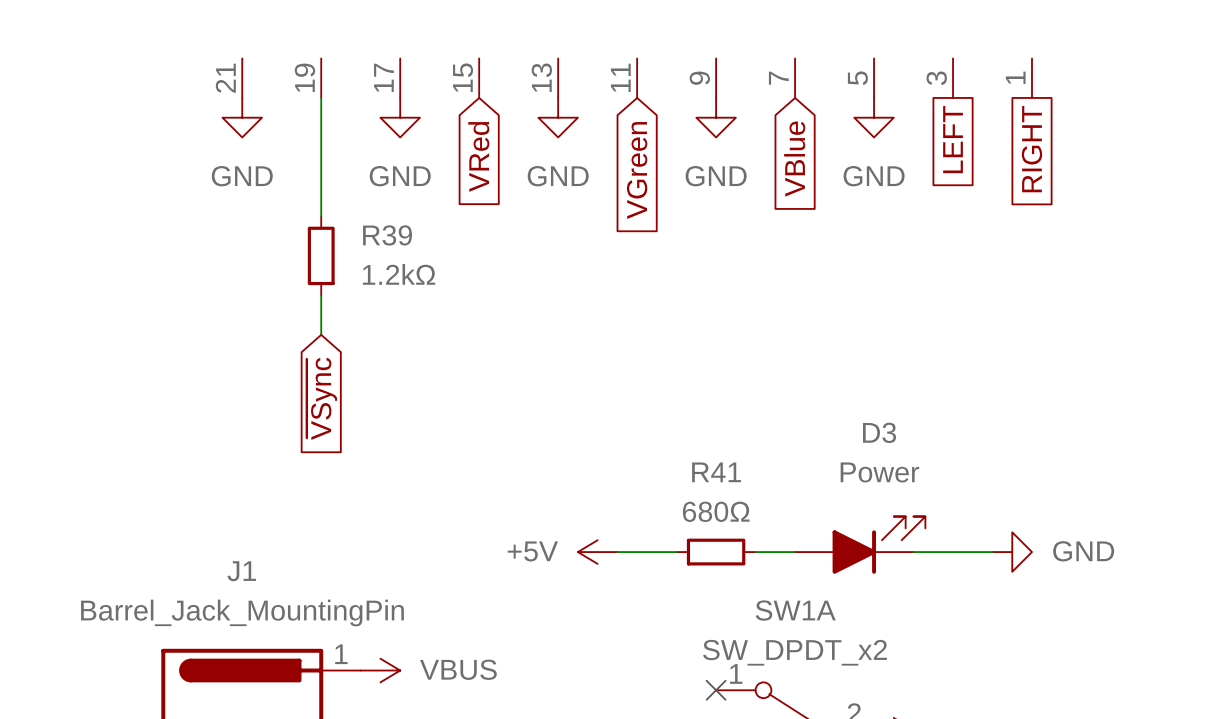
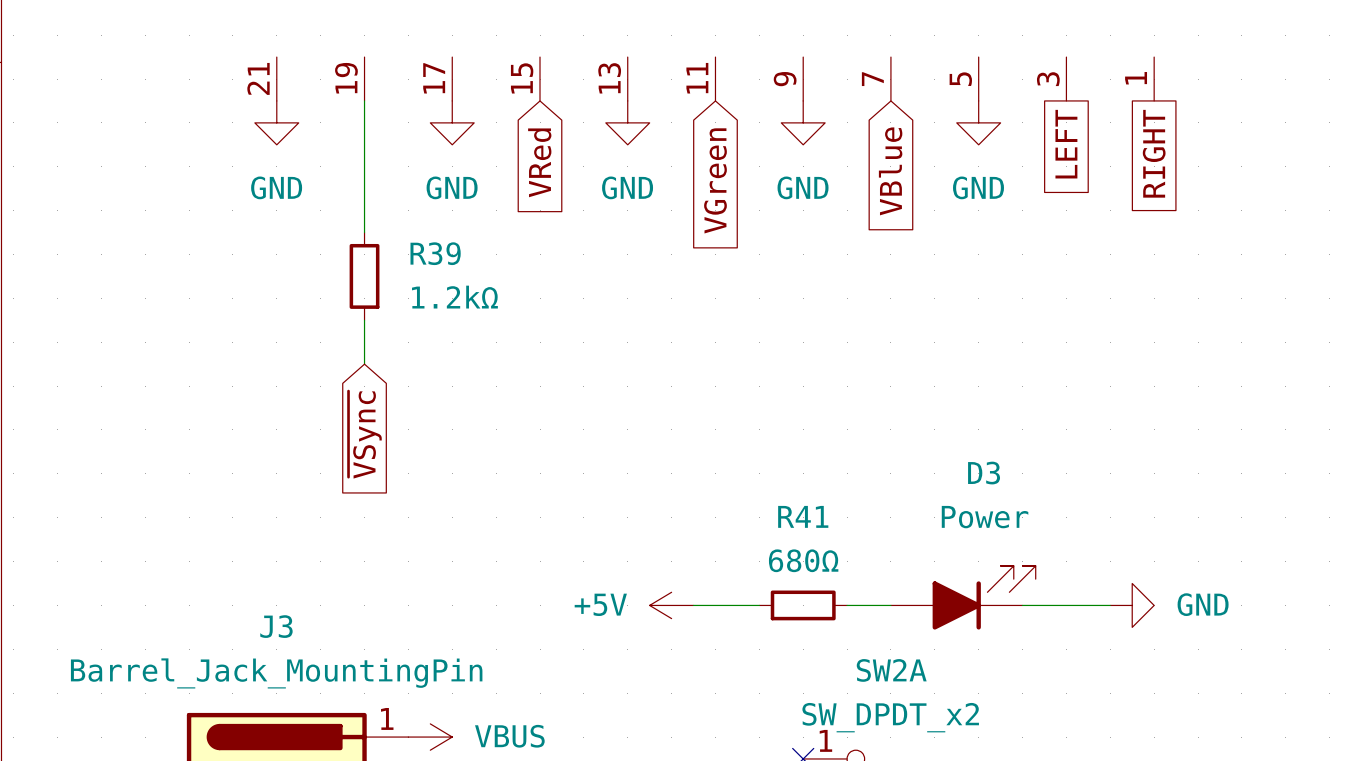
J1 name: J1 (241, 571) -> J3 (276, 626)
SW1A name: SW1A (795, 610) -> SW2A (891, 670)

